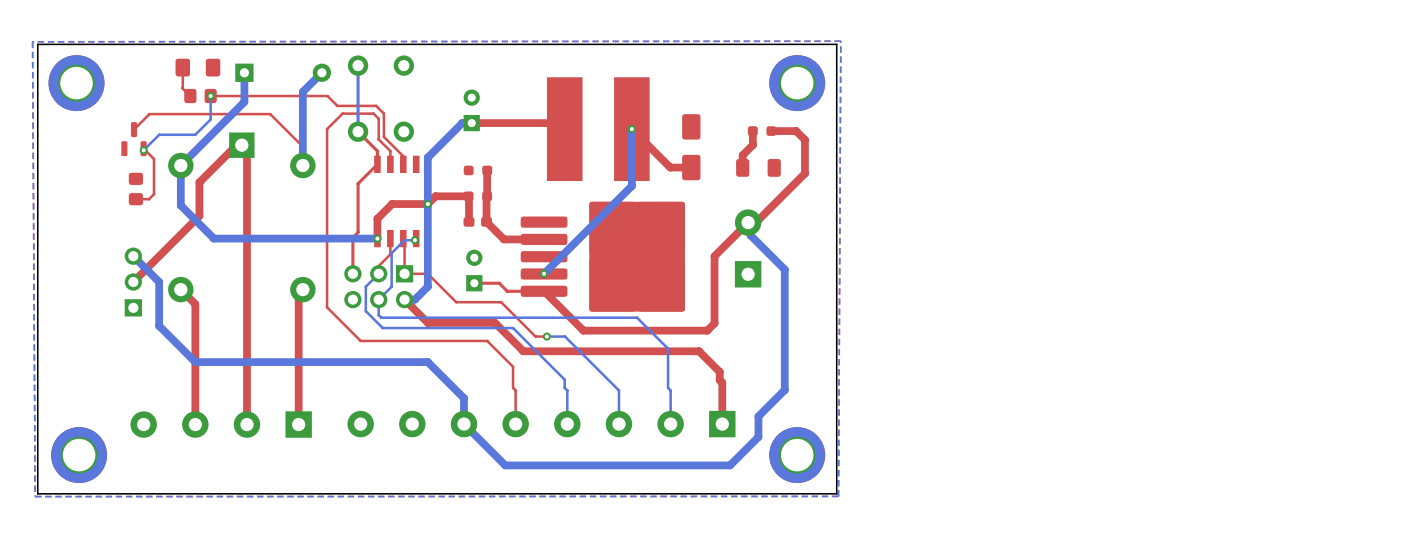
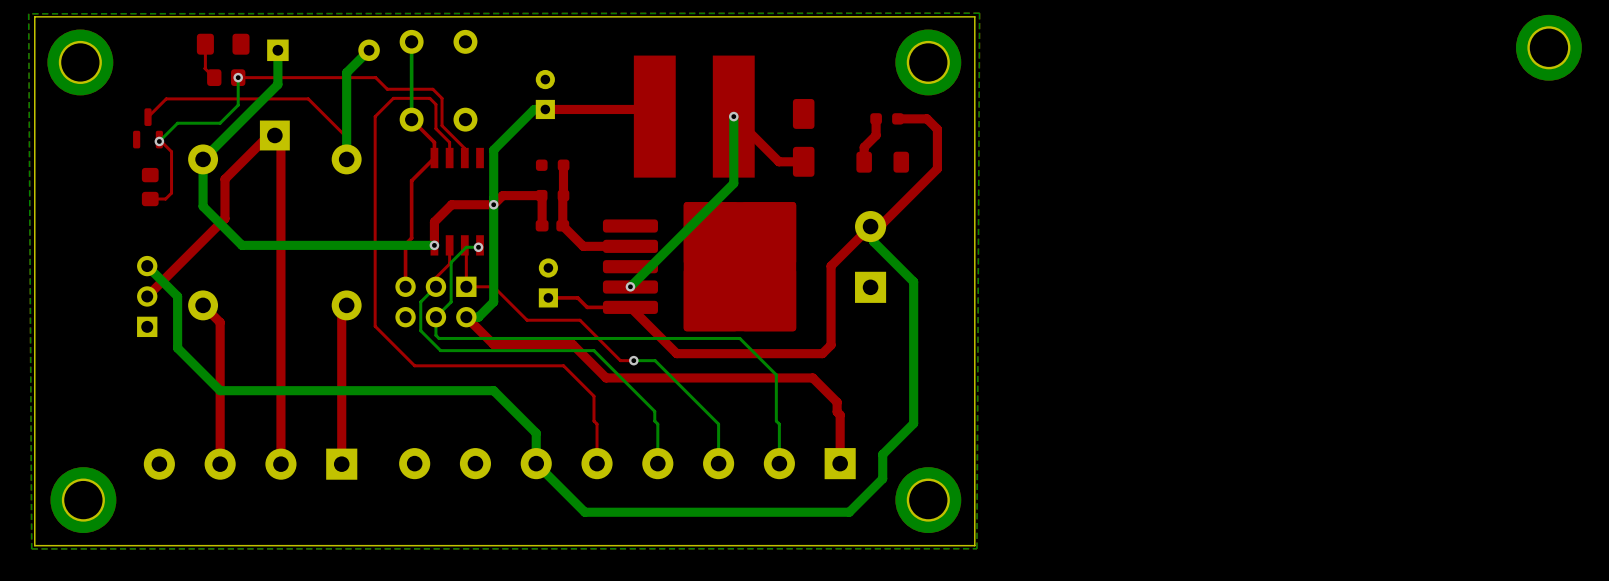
part: none -> (1548, 47)

